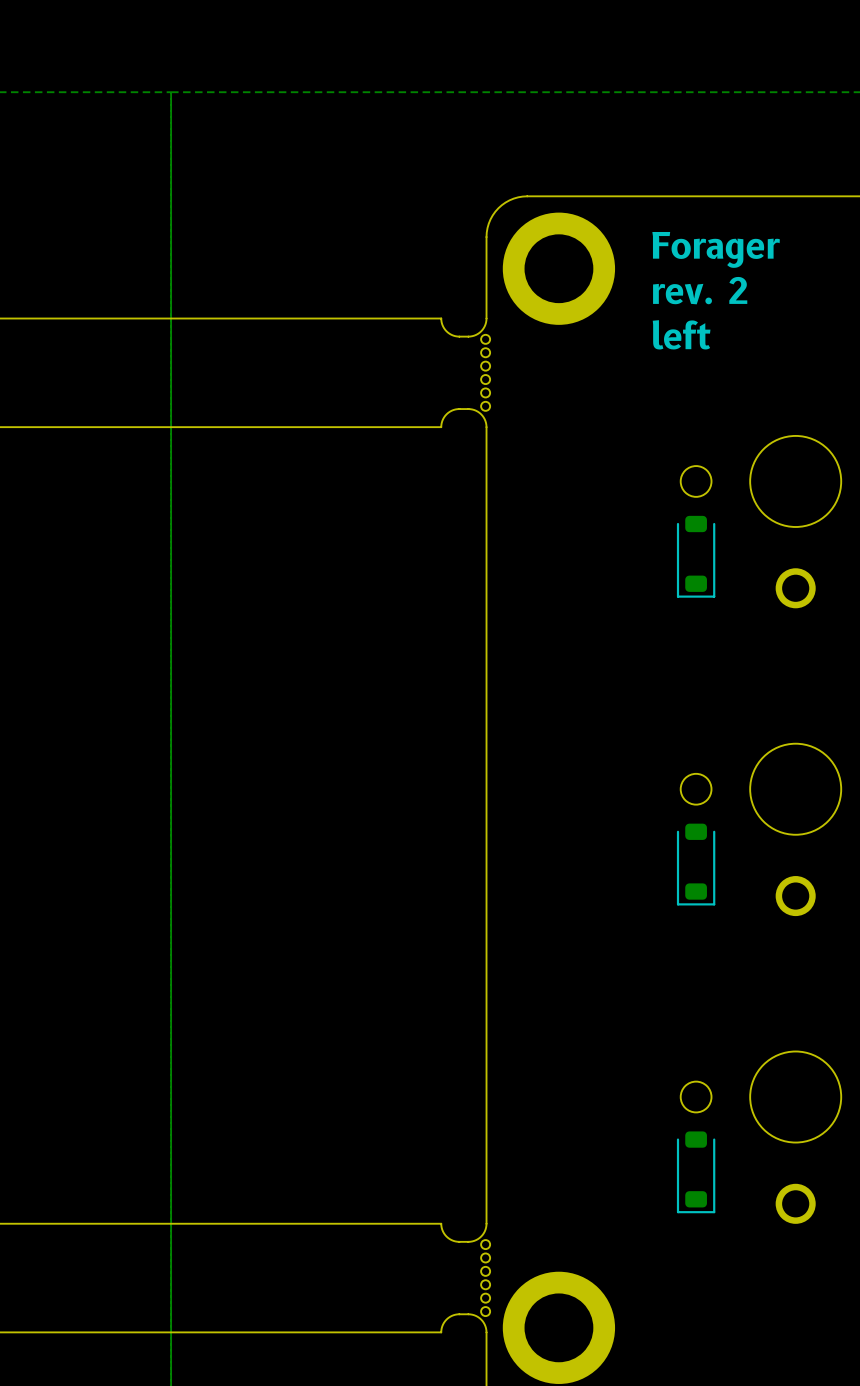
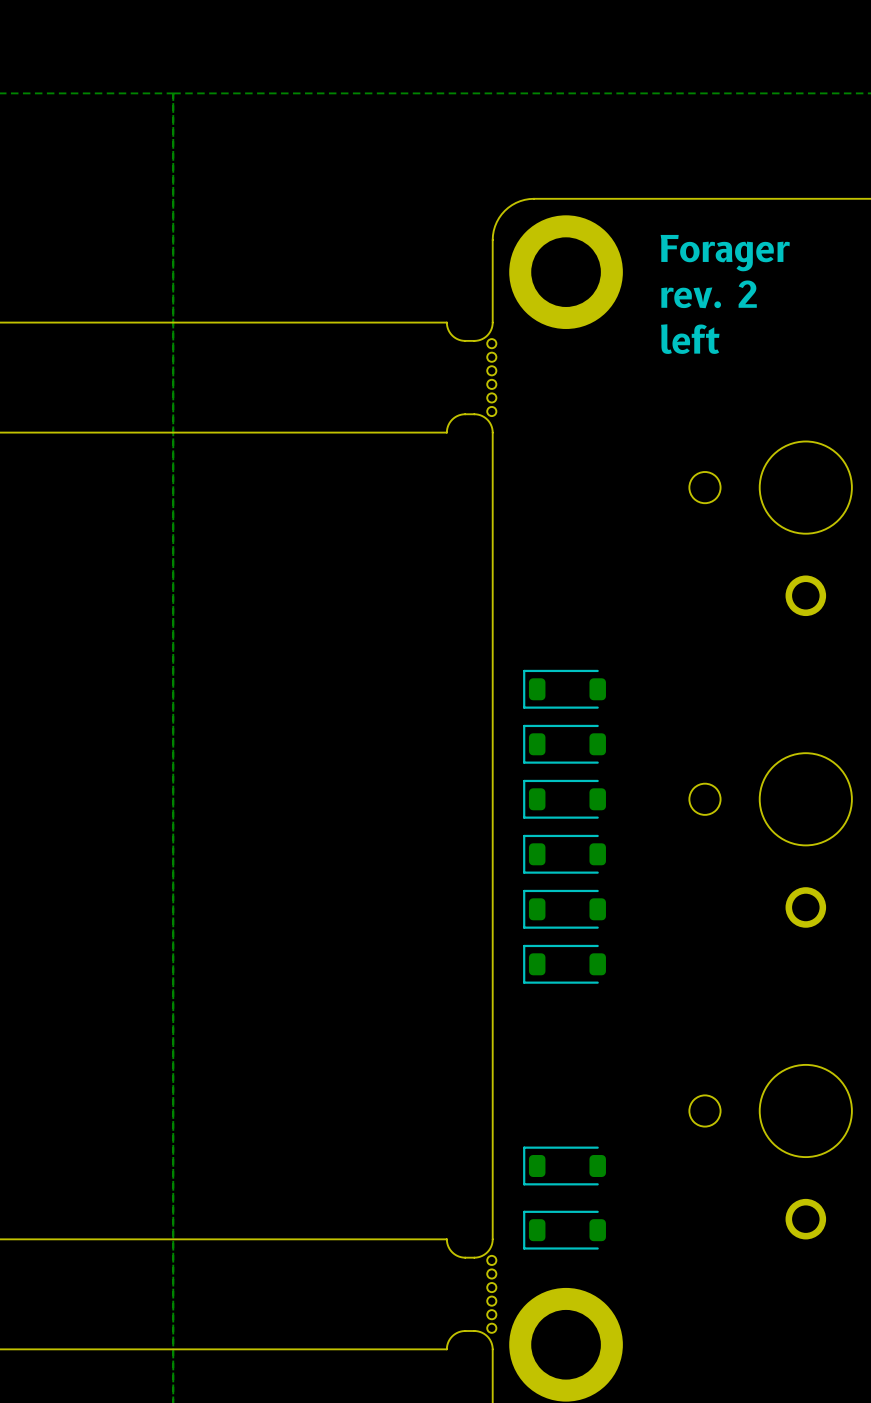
part: (696, 556) -> none
part: none -> (564, 689)
part: none -> (564, 744)
part: none -> (564, 799)
part: none -> (564, 854)
part: (696, 864) -> none
part: none -> (564, 909)
part: none -> (564, 964)
part: none -> (564, 1165)
part: (696, 1172) -> none
part: none -> (564, 1230)

